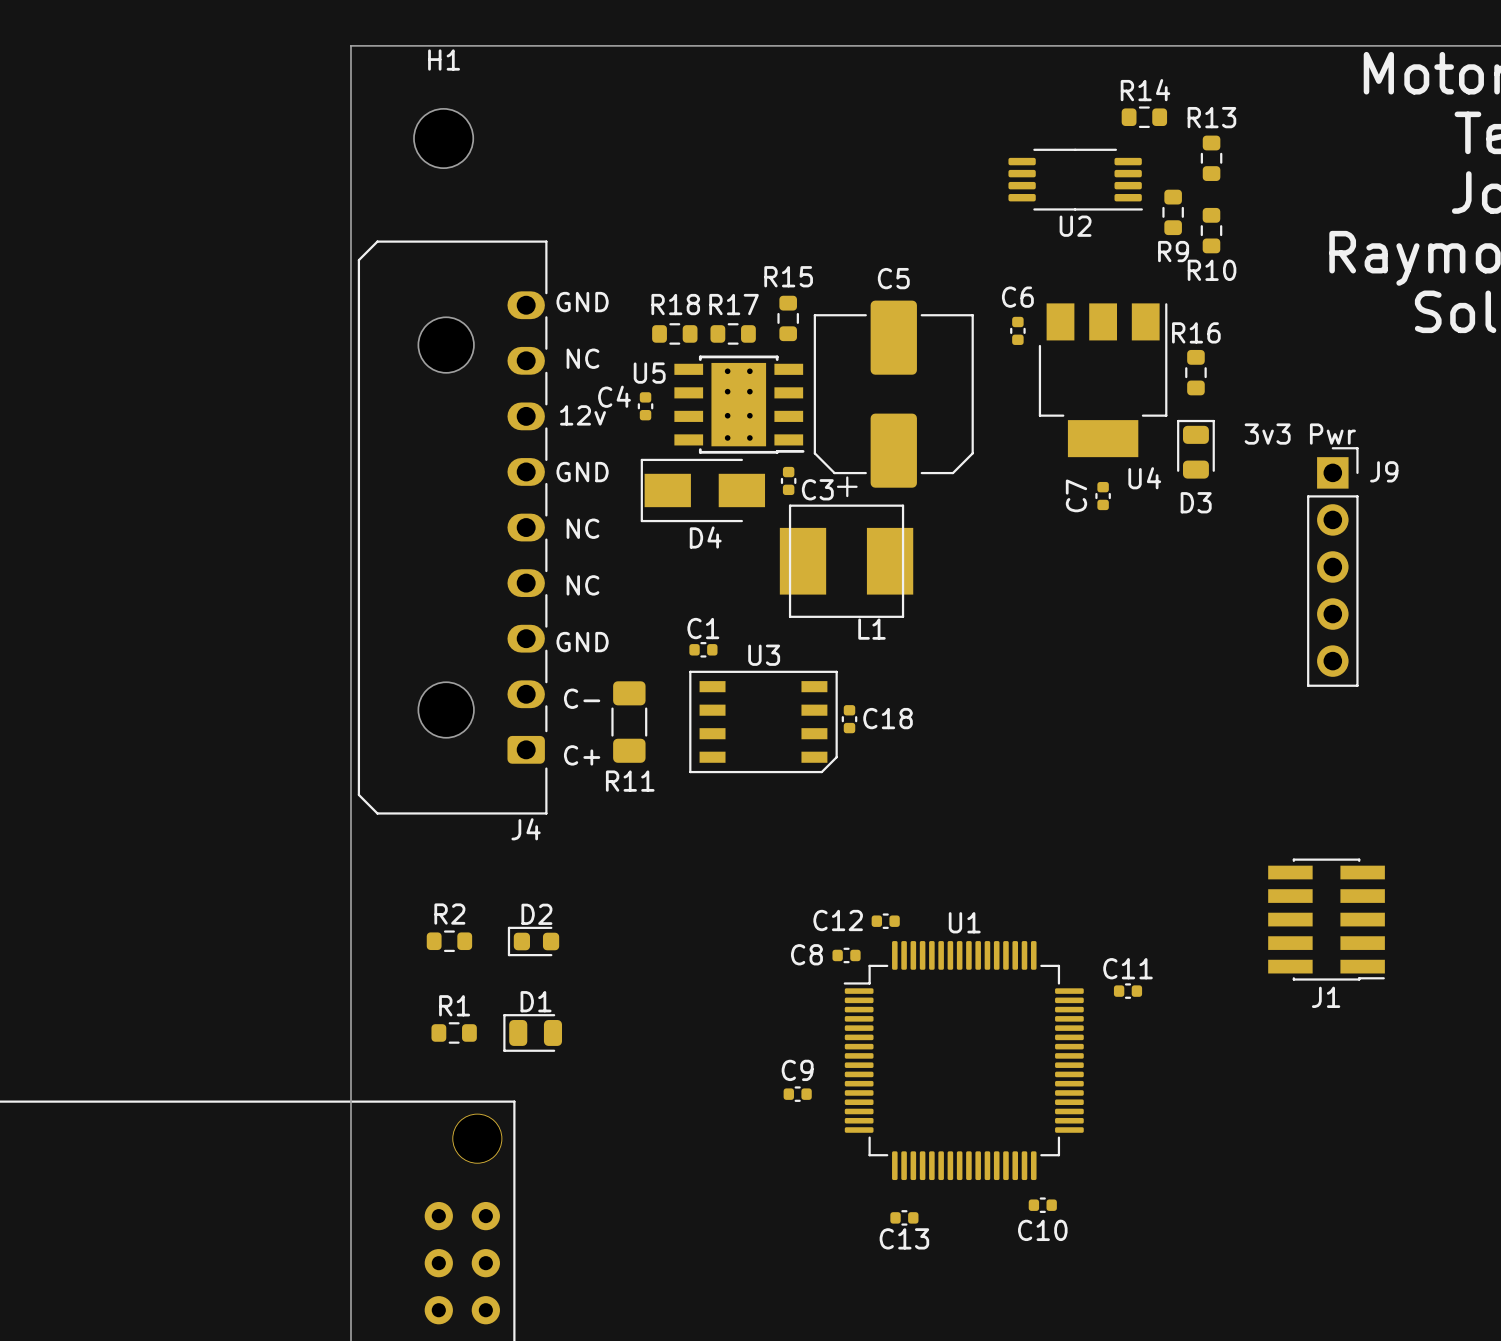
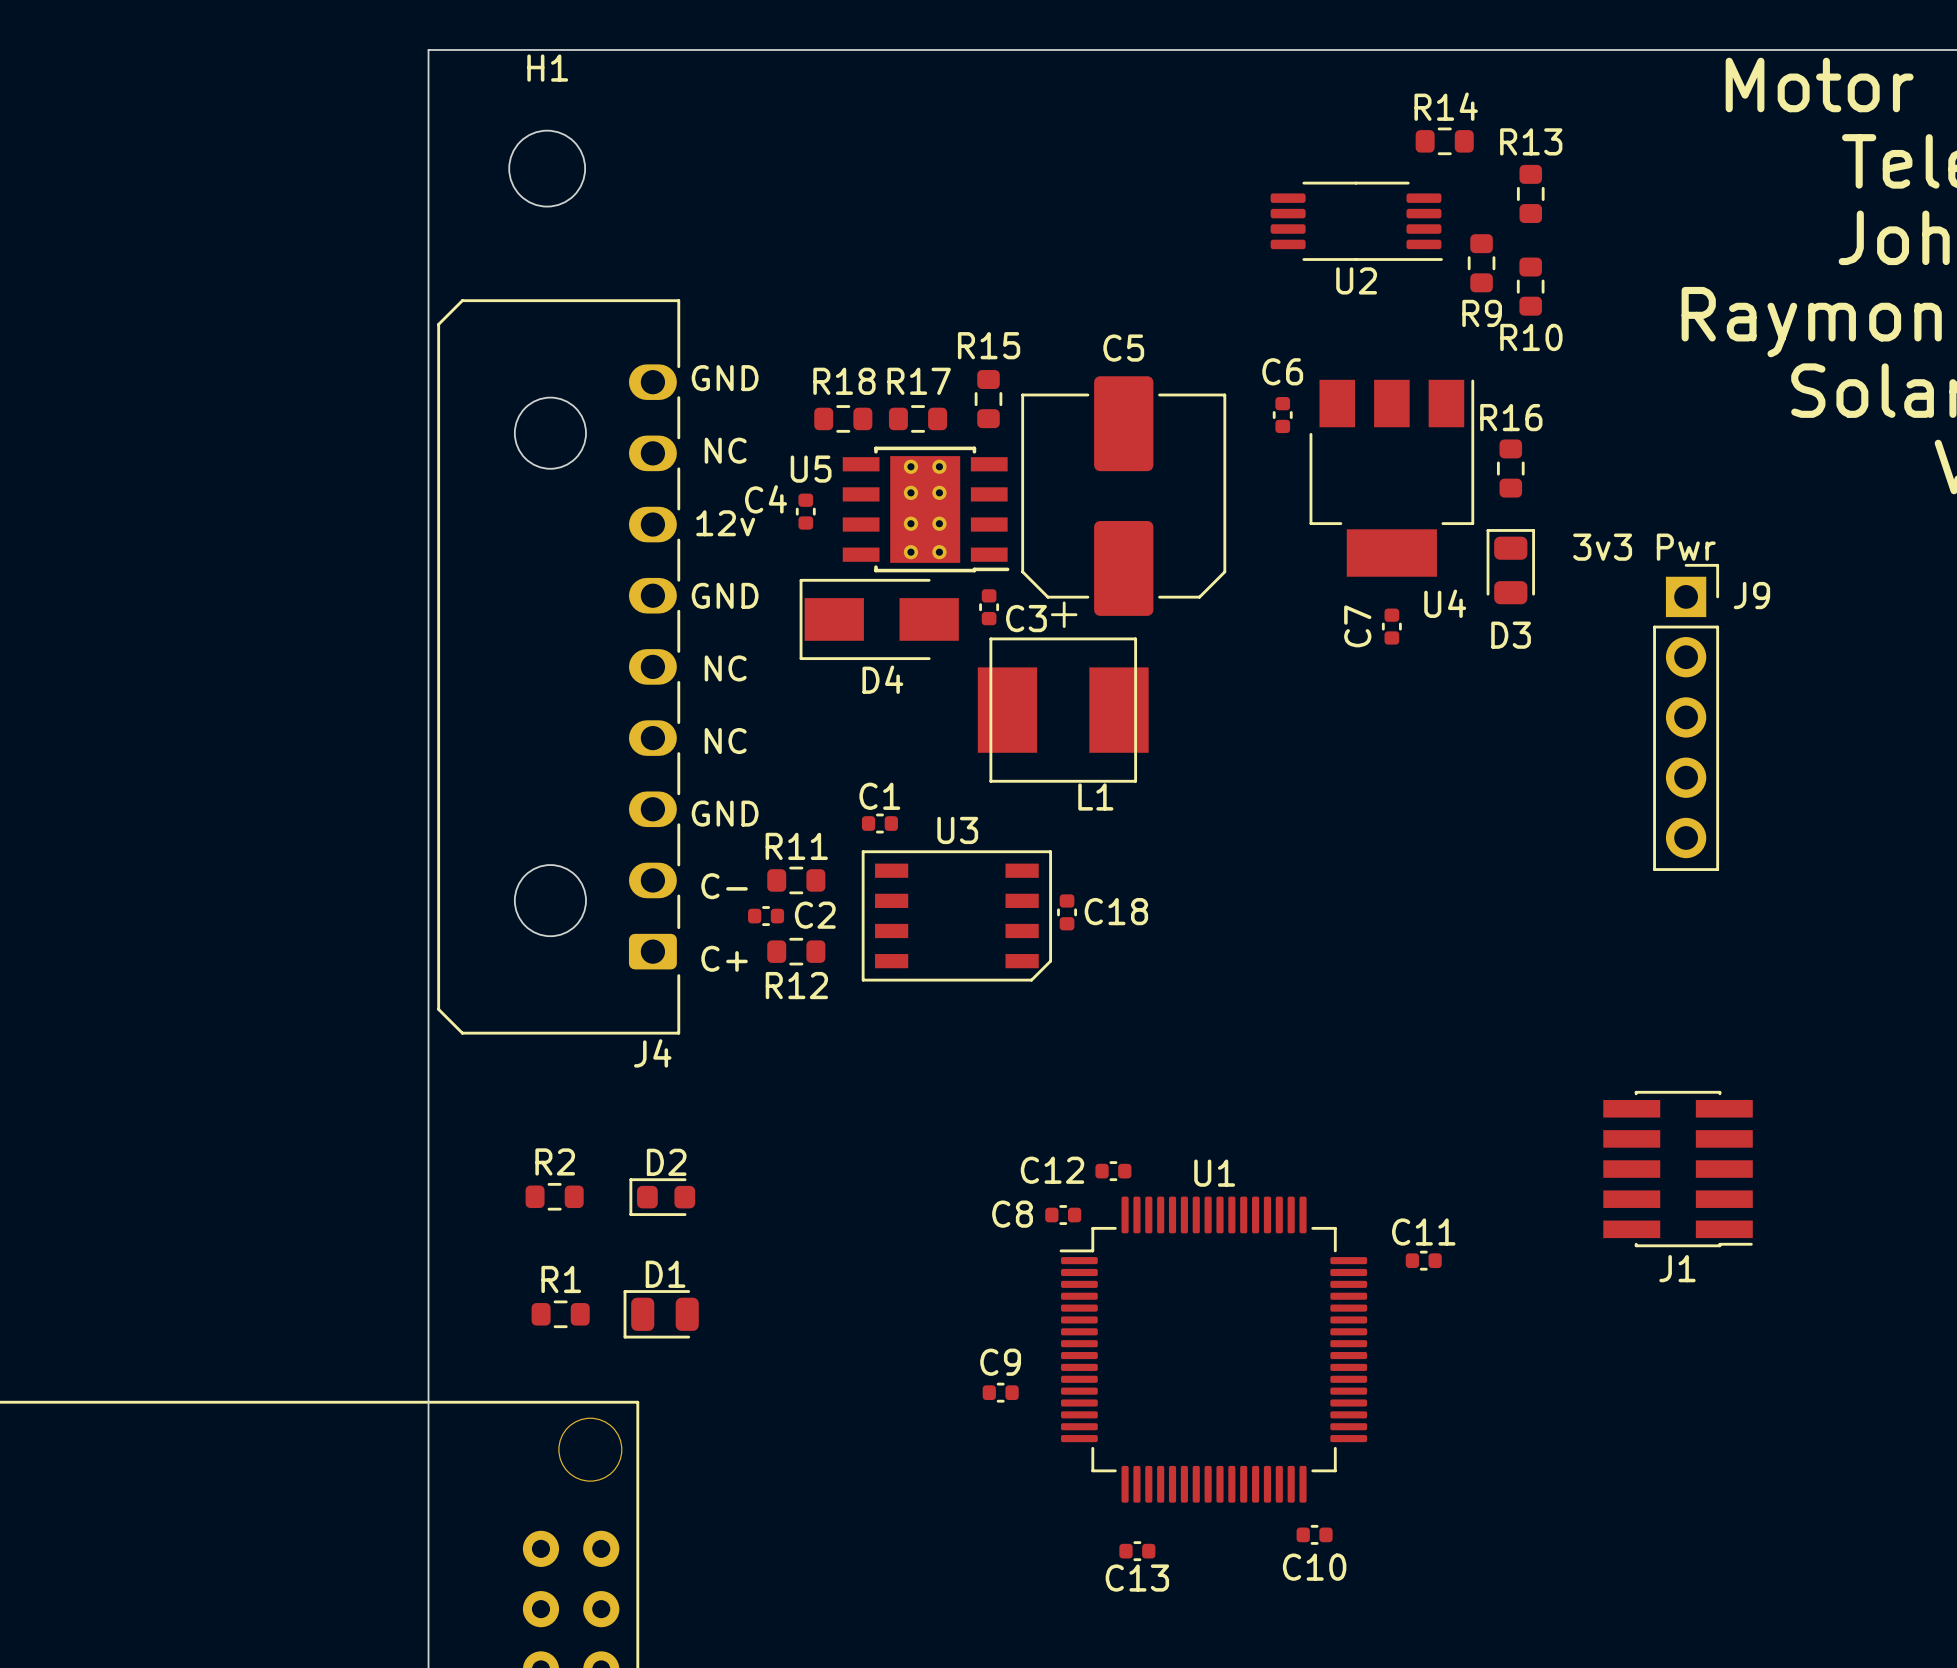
R11 footprint: [611, 681, 648, 763] -> [767, 866, 826, 895]
C2: none -> (766, 916)
R12: none -> (796, 951)
R11 name position: R11 (630, 781) -> R11 (796, 846)

